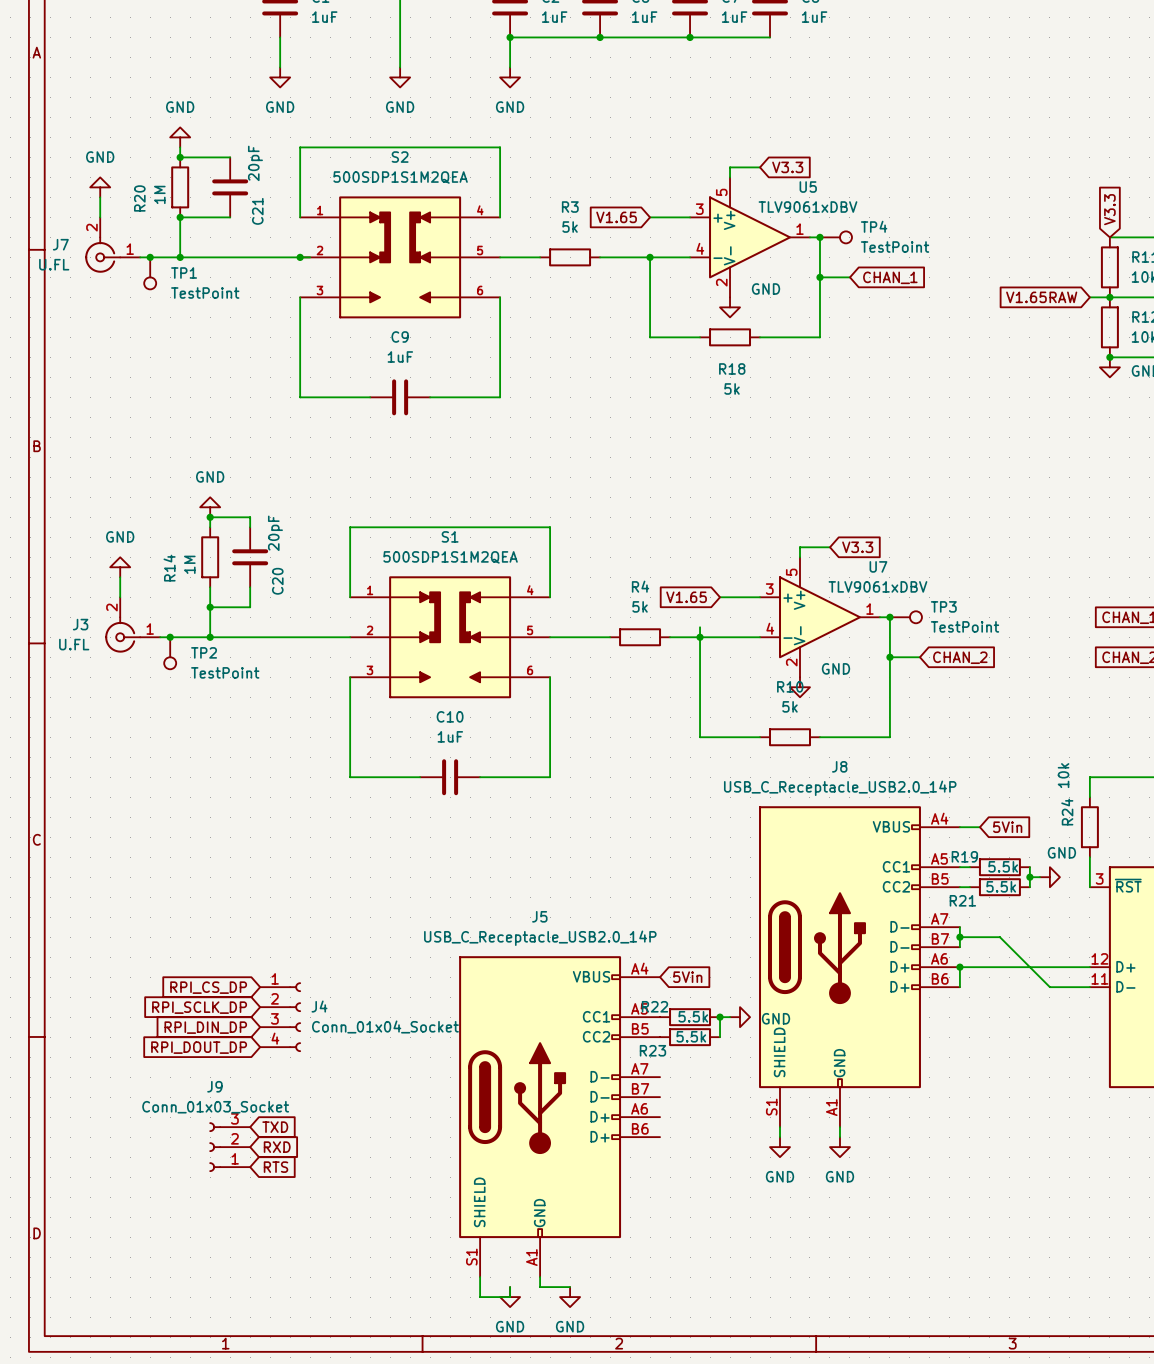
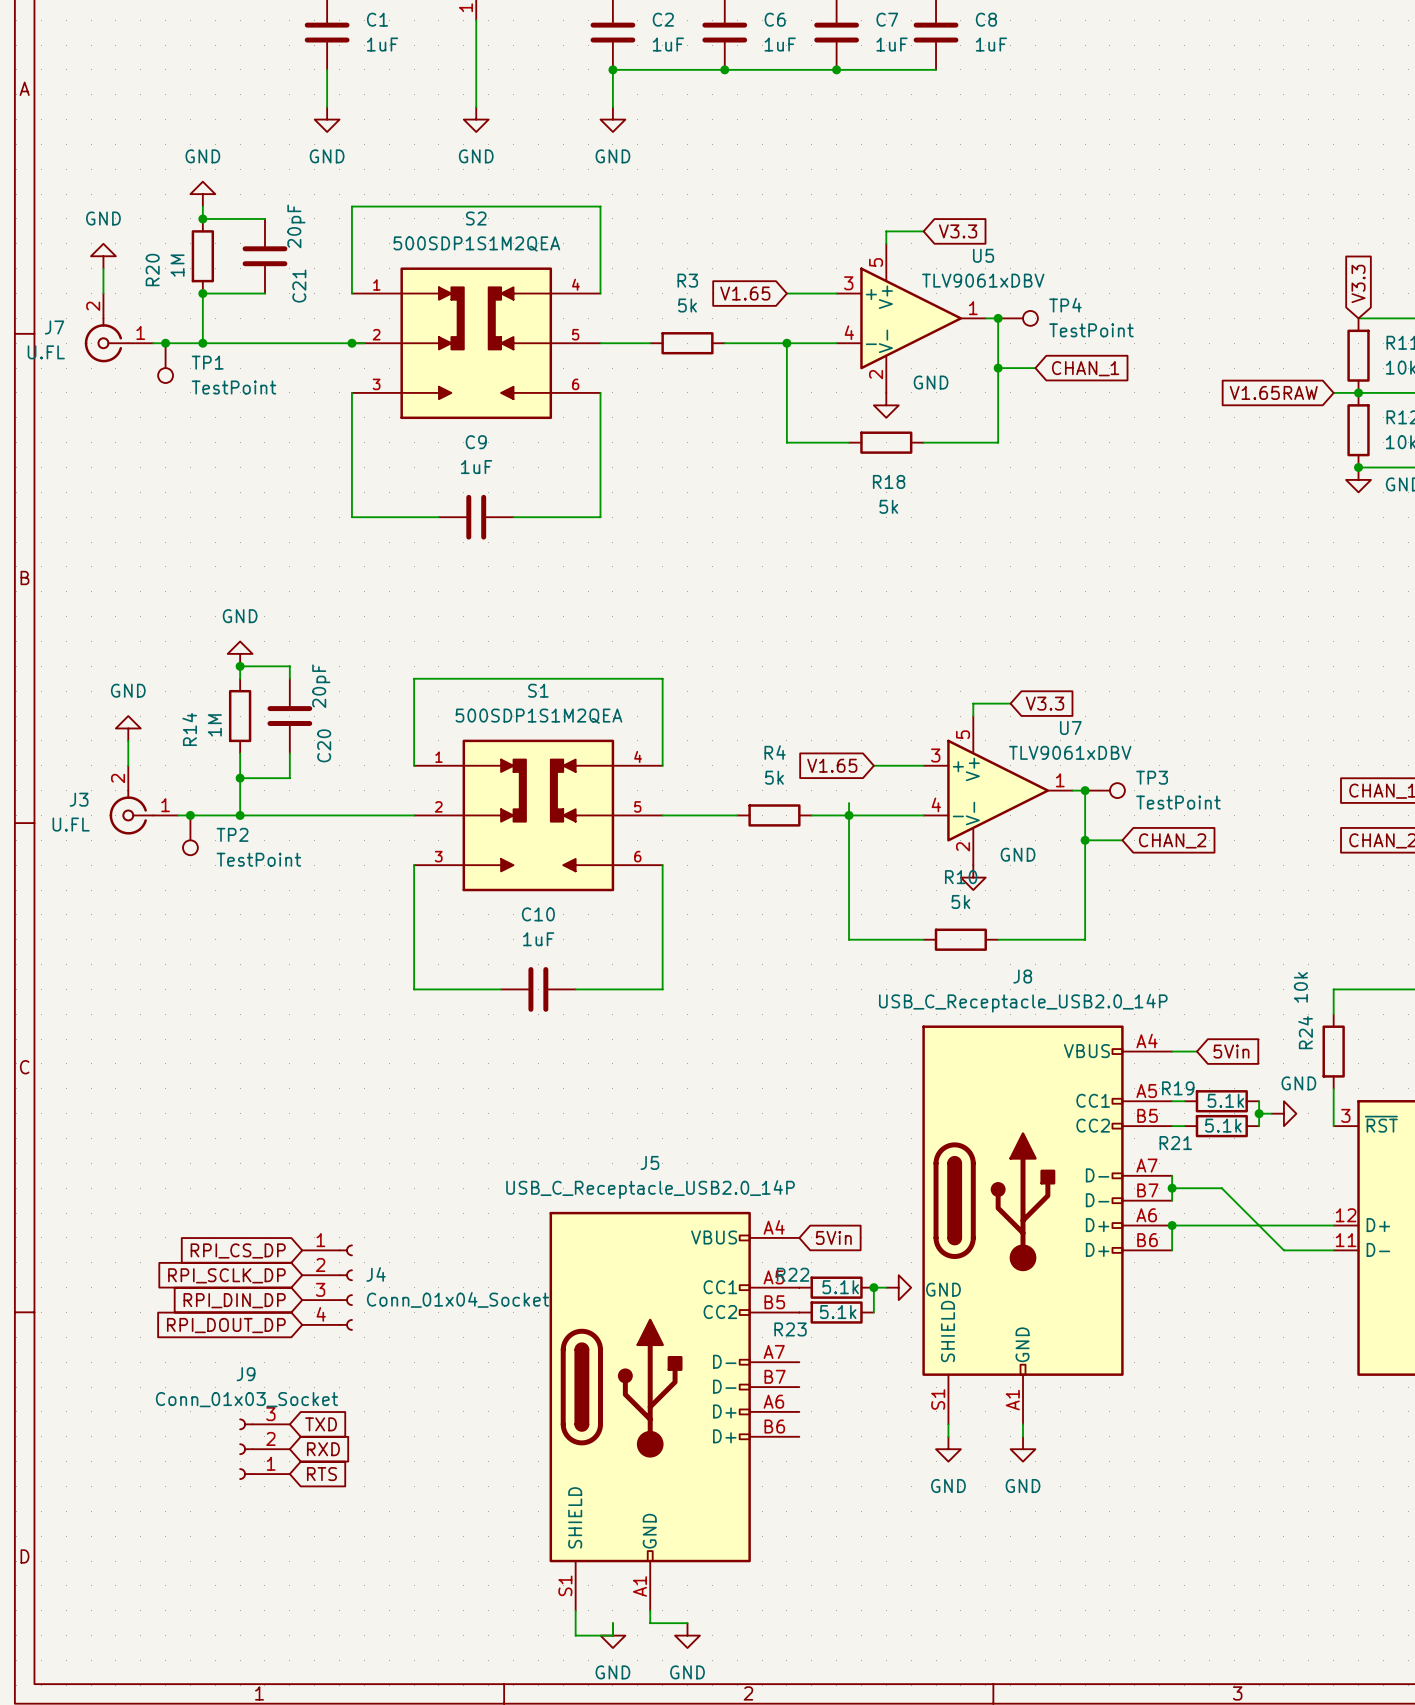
R21 value: 5.5k (1003, 866) -> 5.1k (1225, 1100)
R19 value: 5.5k (1001, 886) -> 5.1k (1223, 1125)
R23 value: 5.5k (693, 1016) -> 5.1k (840, 1287)
R22 value: 5.5k (691, 1036) -> 5.1k (838, 1312)

